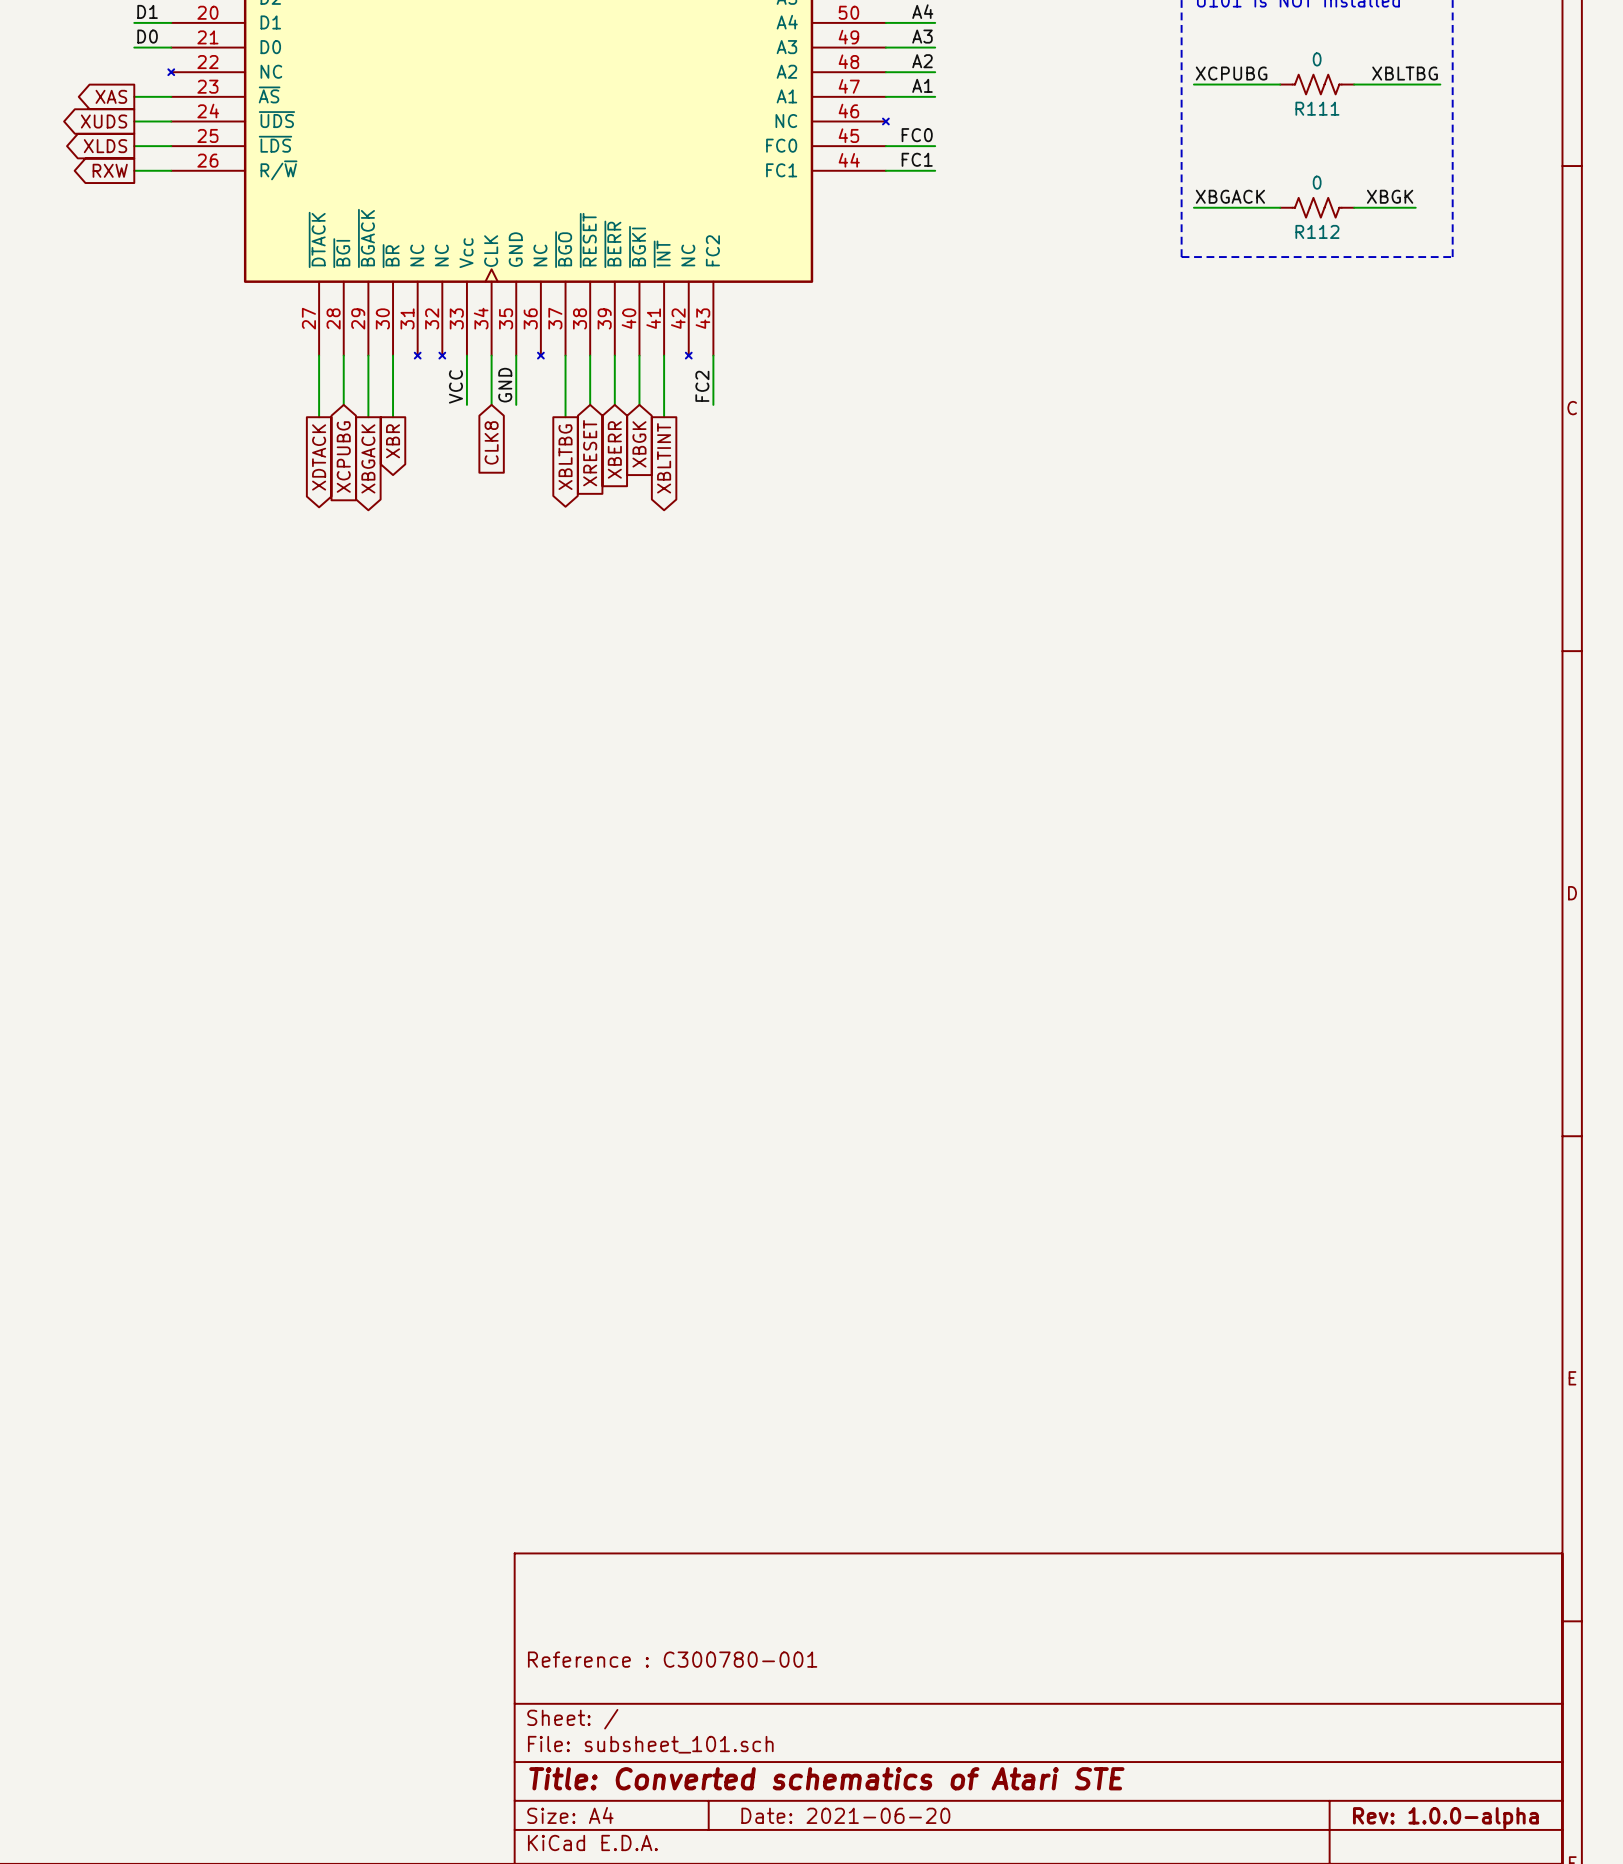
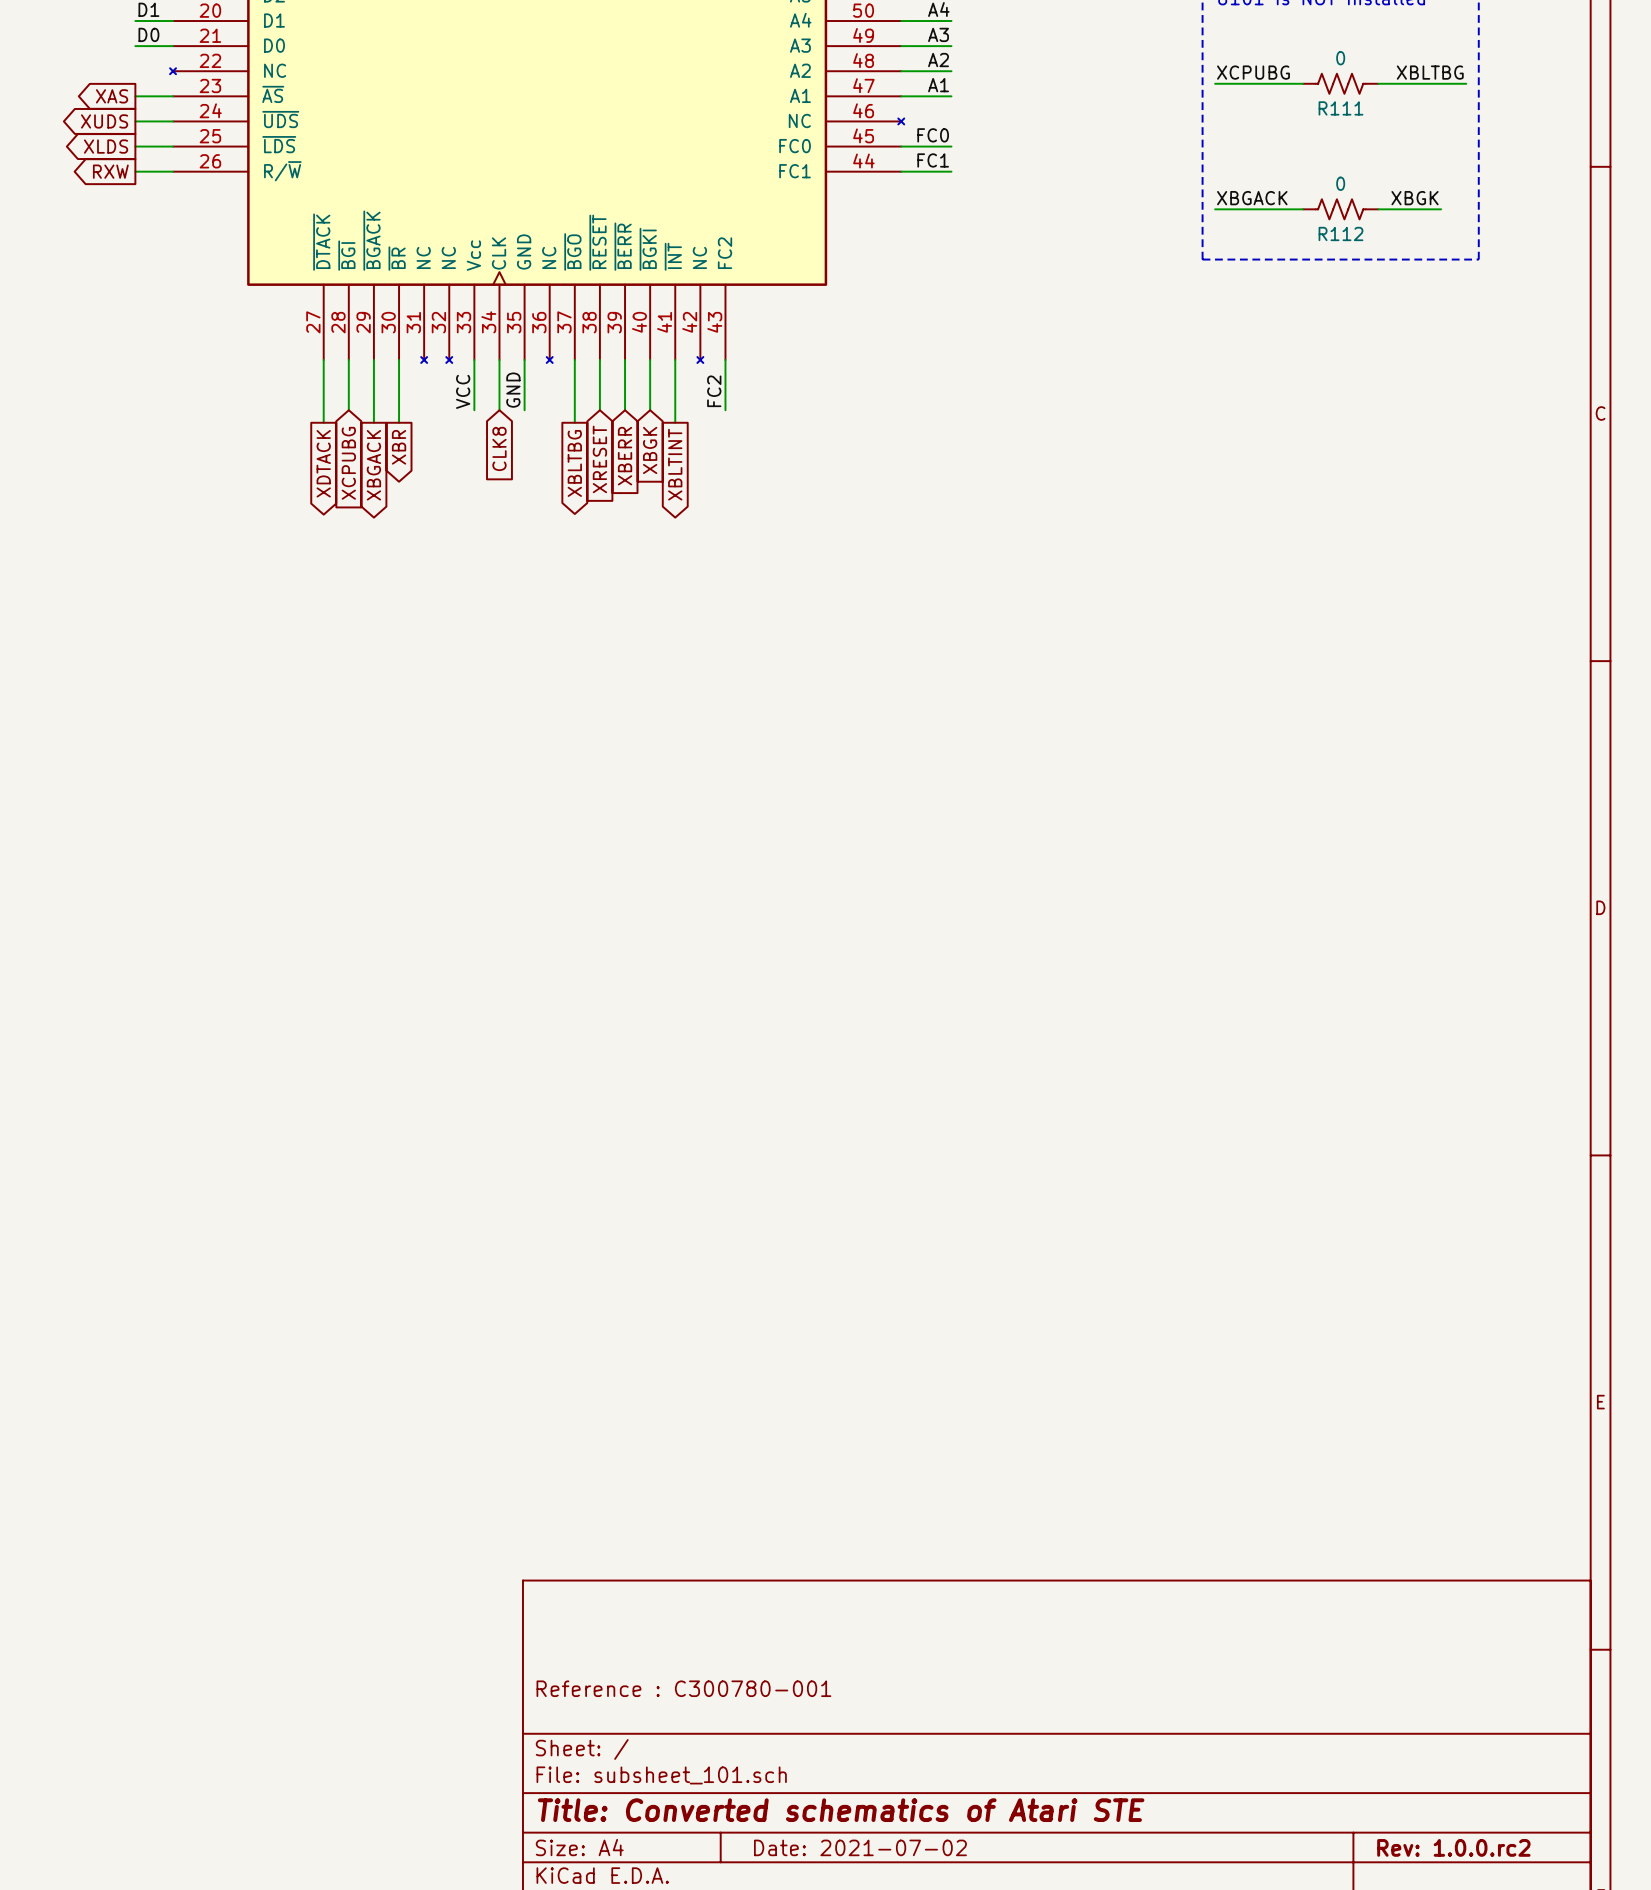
title block: Date: 2021-06-20 (845, 1815) -> Date: 2021-07-02 (860, 1847)
title block: Rev: 1.0.0-alpha (1445, 1818) -> Rev: 1.0.0.rc2 (1453, 1847)

